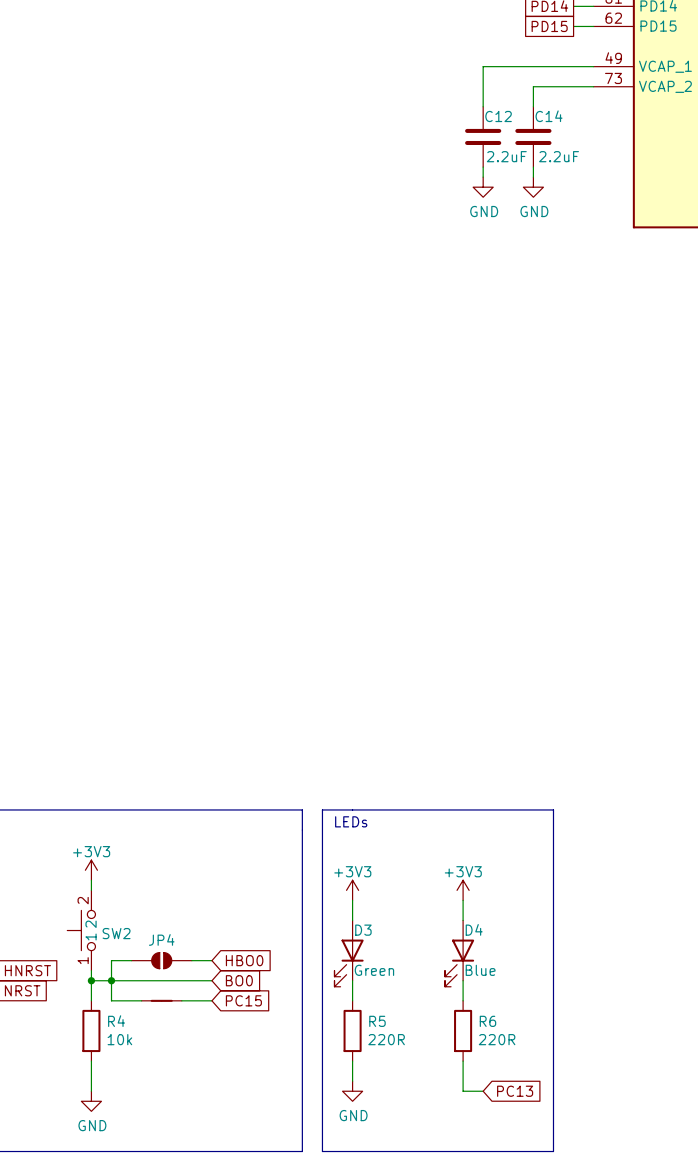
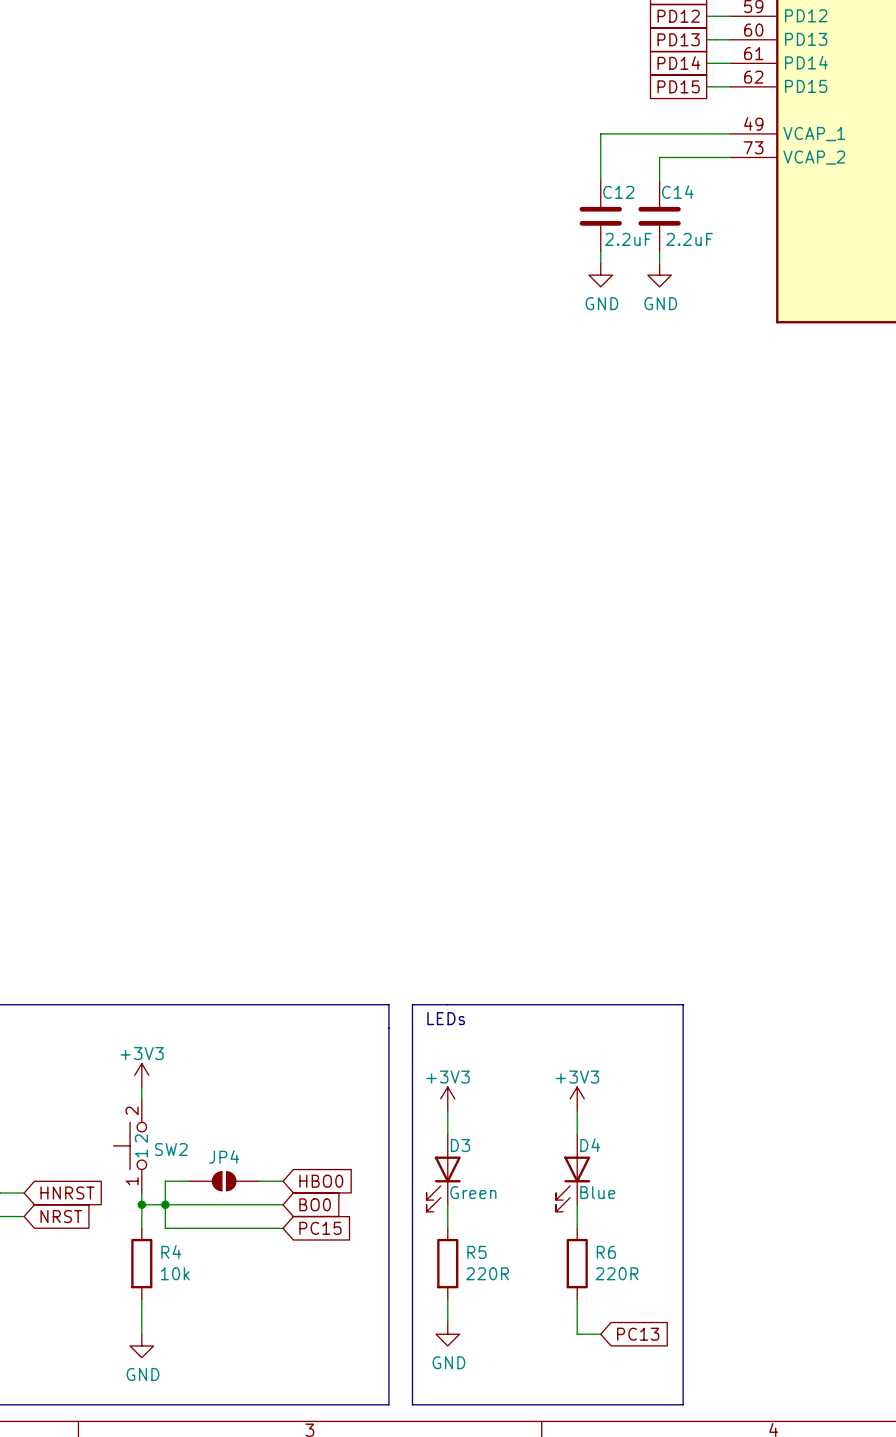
part: (161, 1000) -> none

